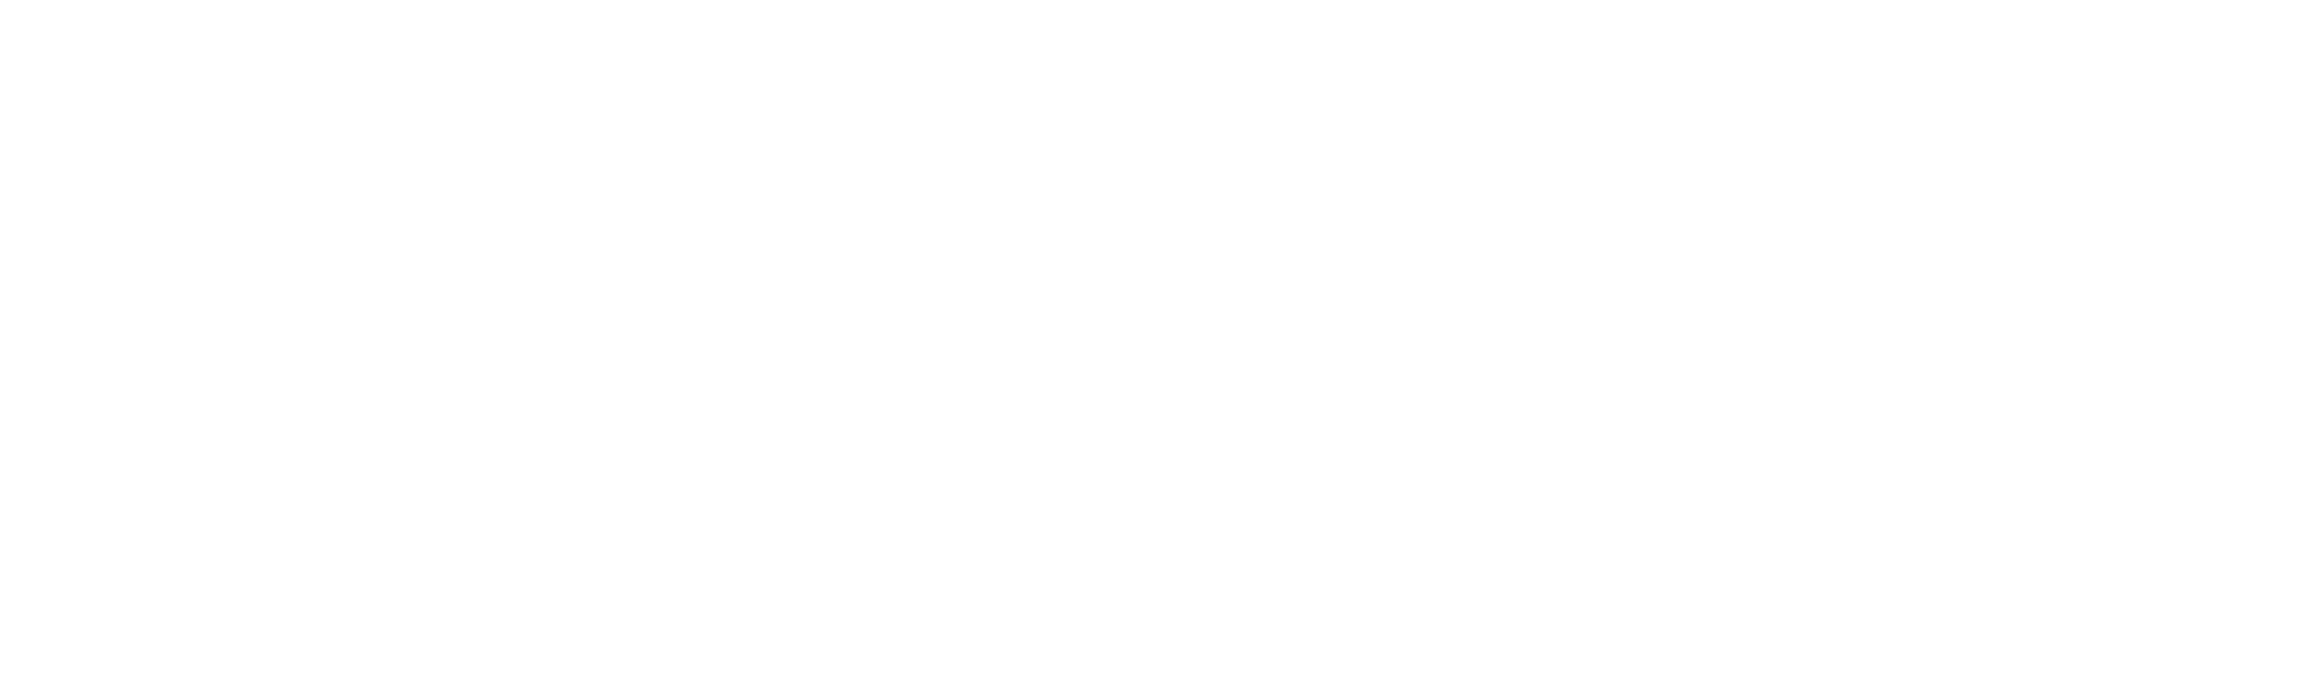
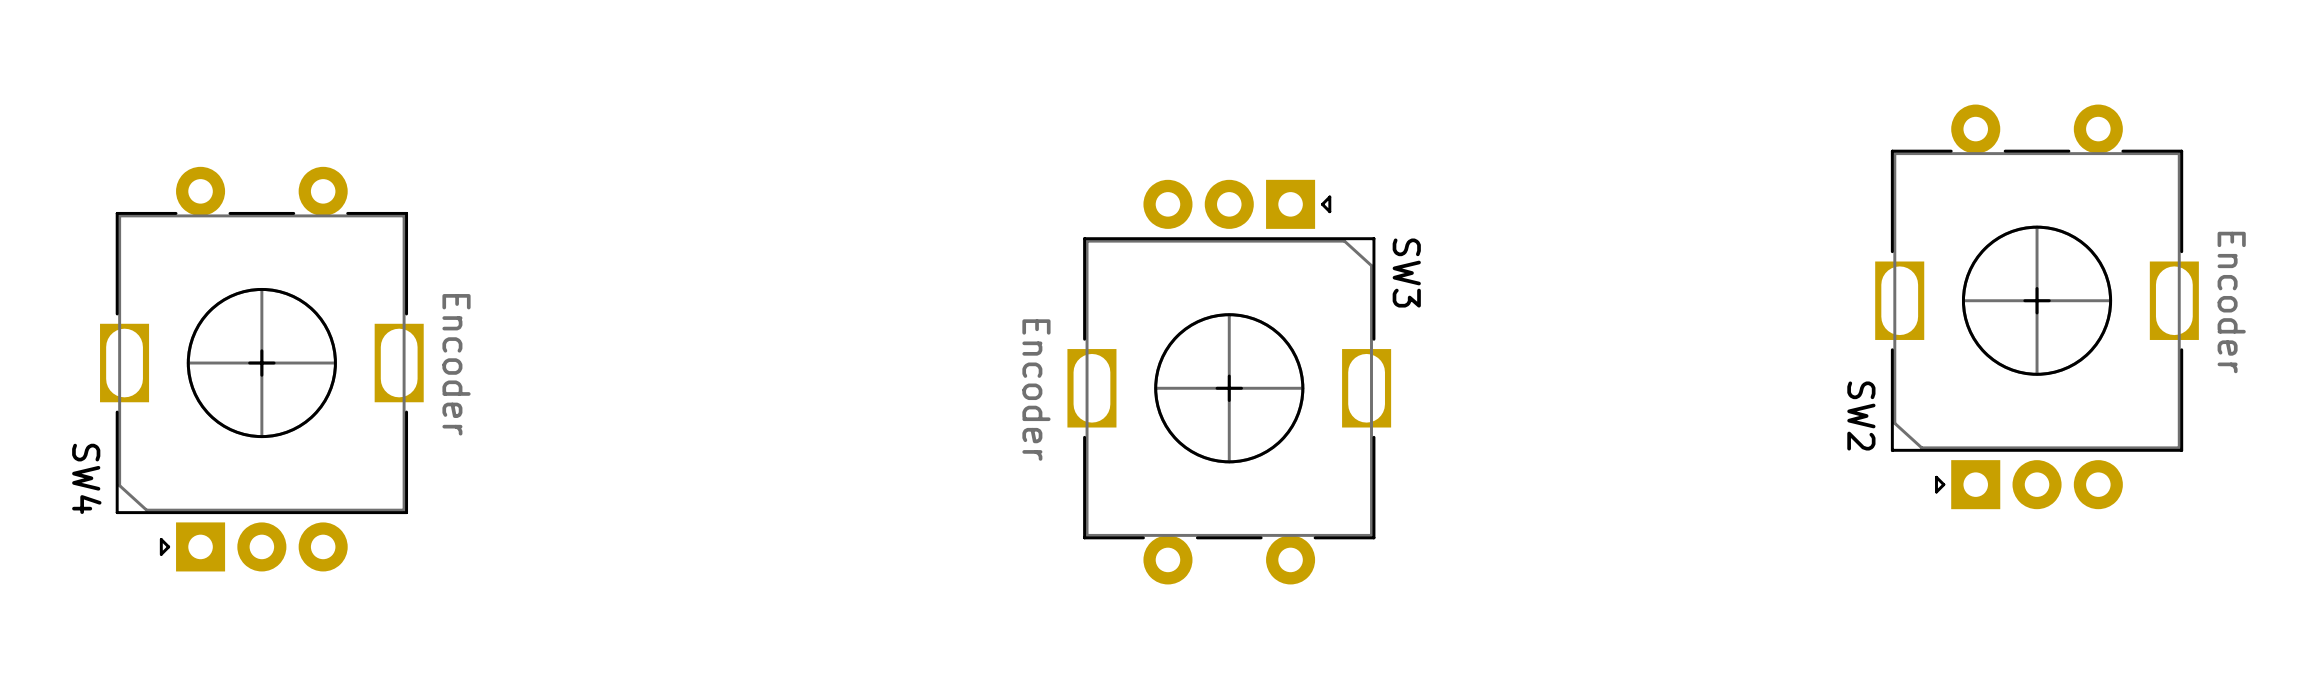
SW2: none -> Encoder (2037, 306)
SW4: none -> Encoder (261, 369)
SW3: none -> Encoder (1229, 382)

